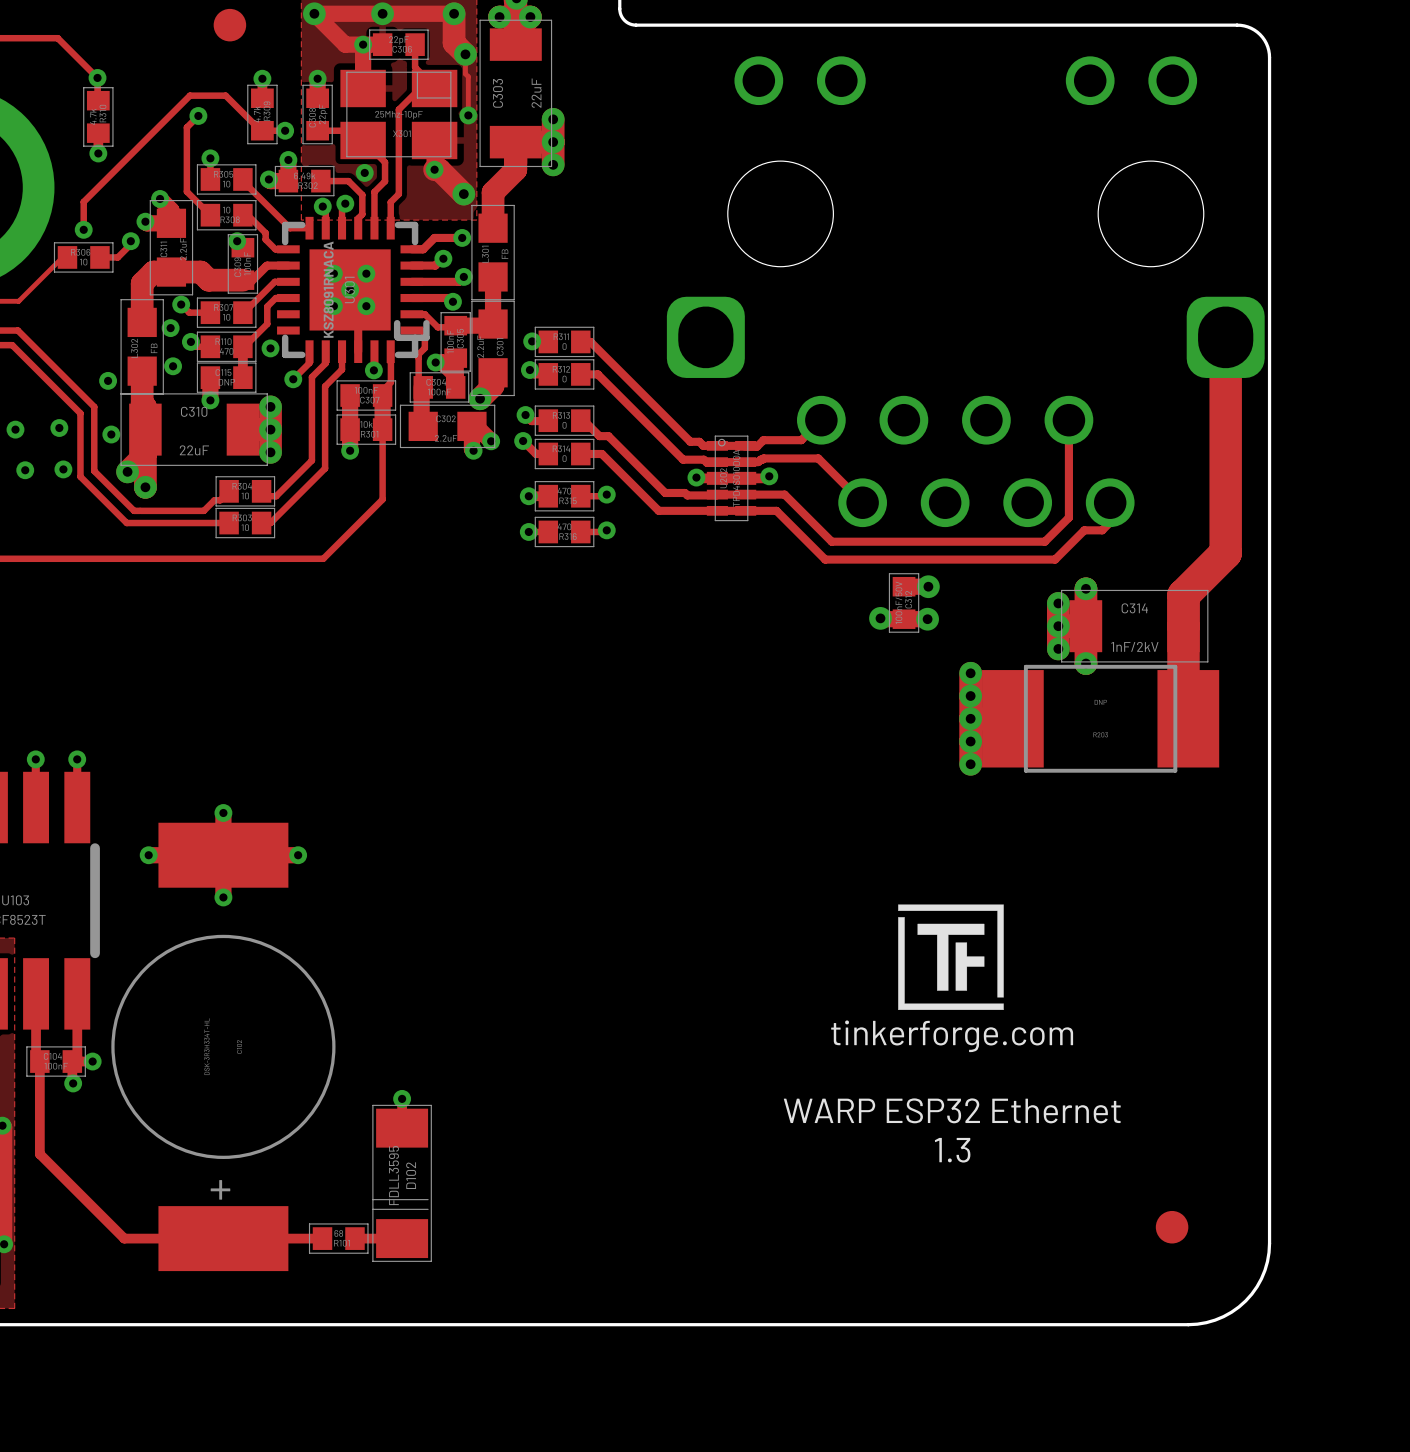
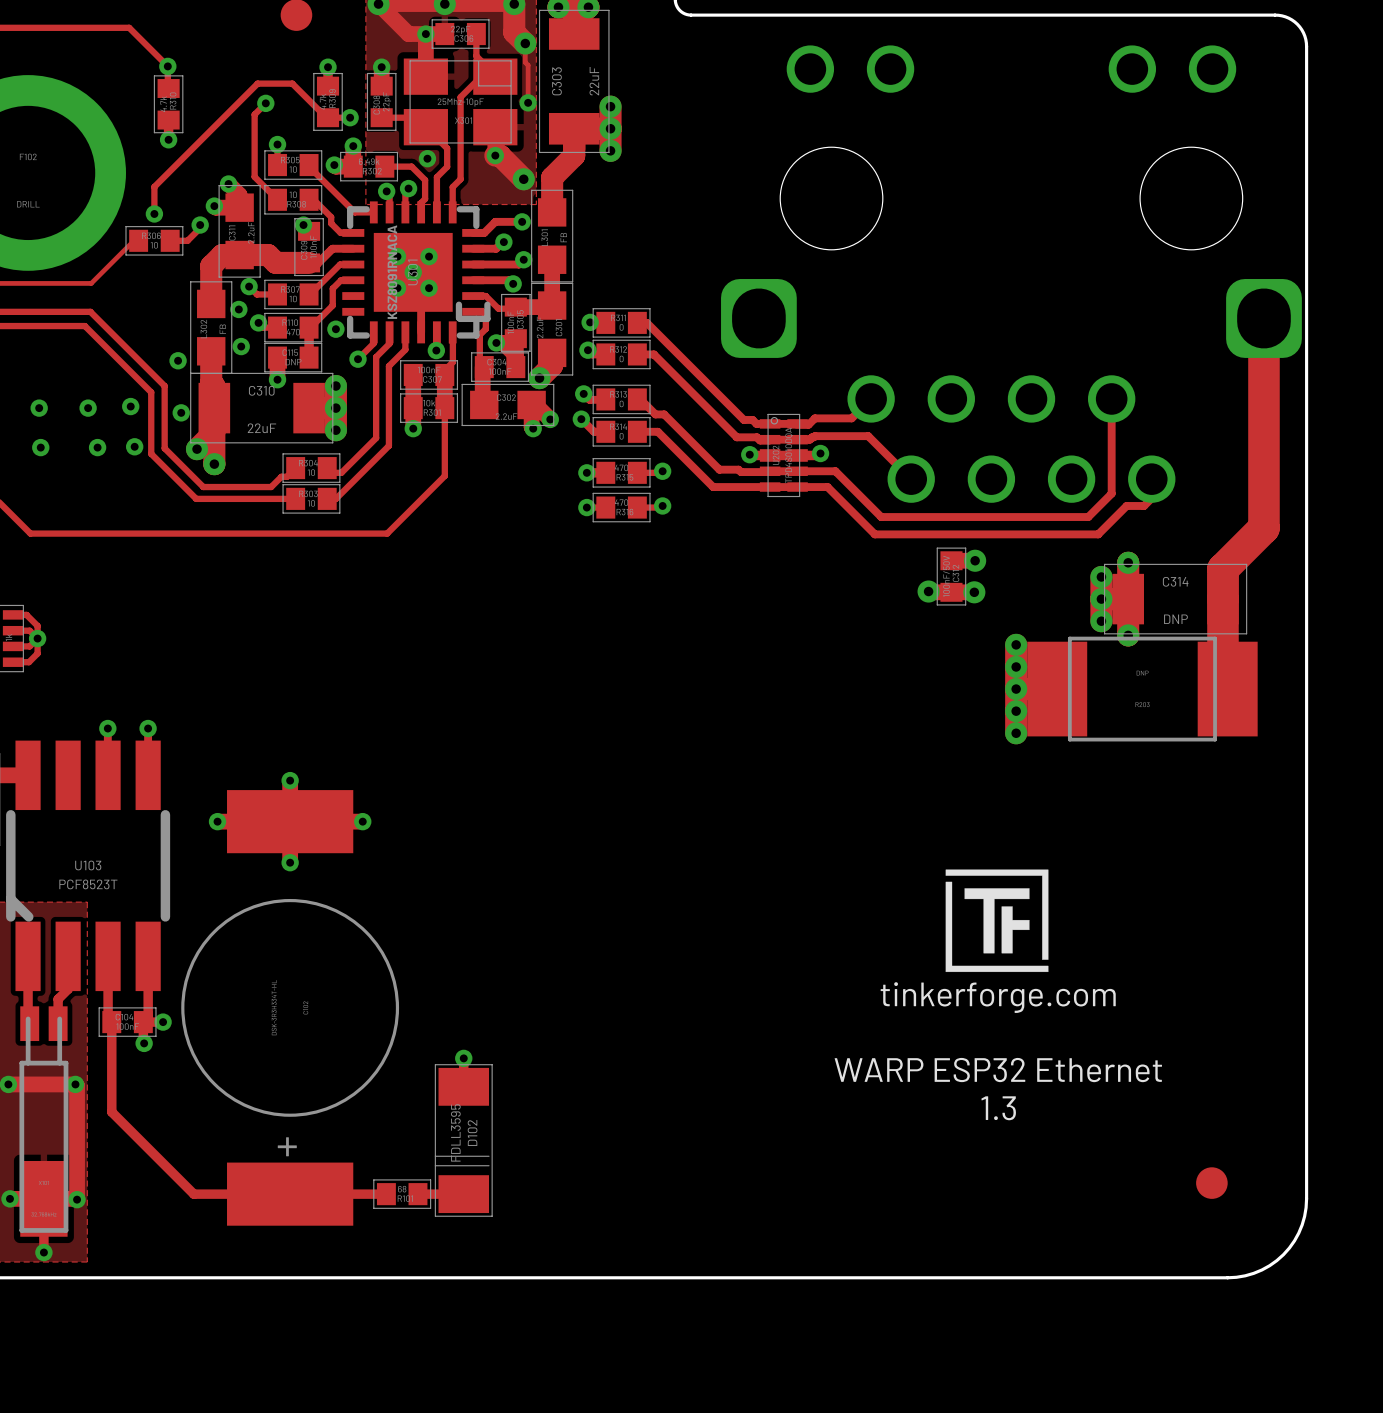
C314 value: 1nF/2kV (1134, 646) -> DNP (1175, 619)

